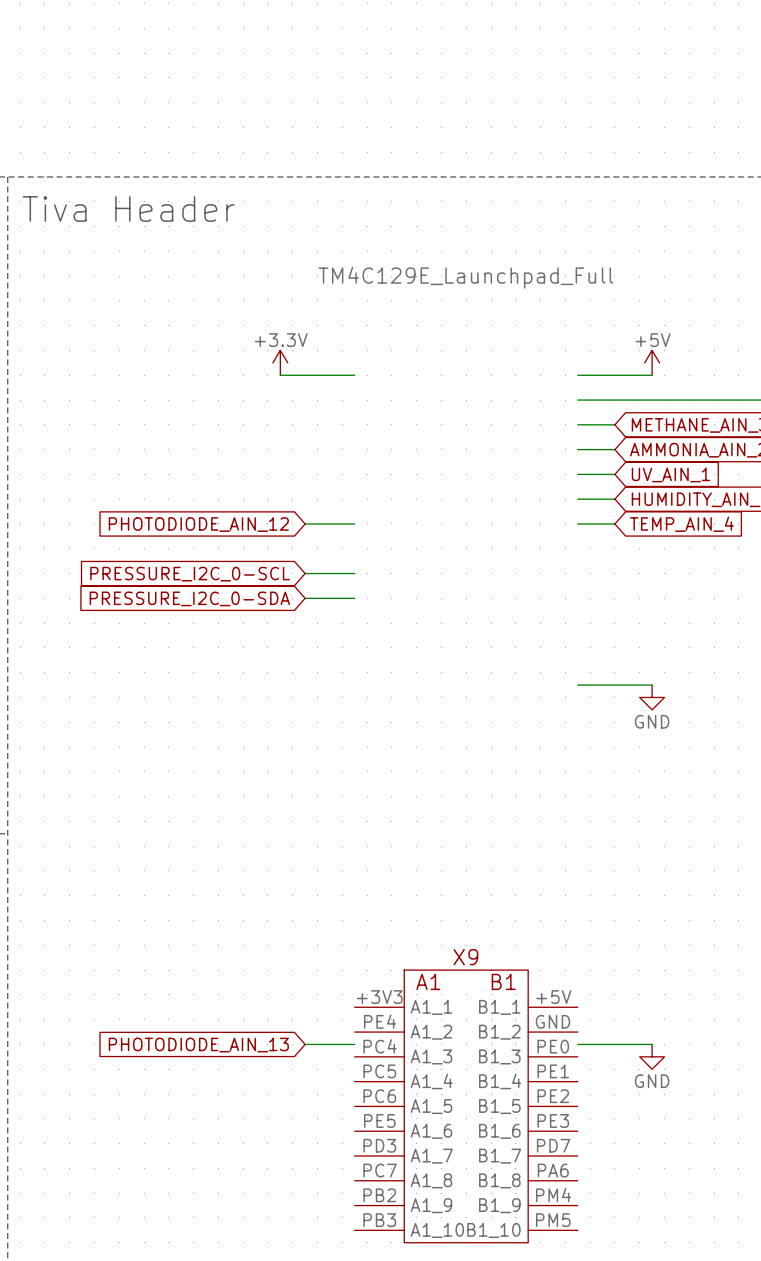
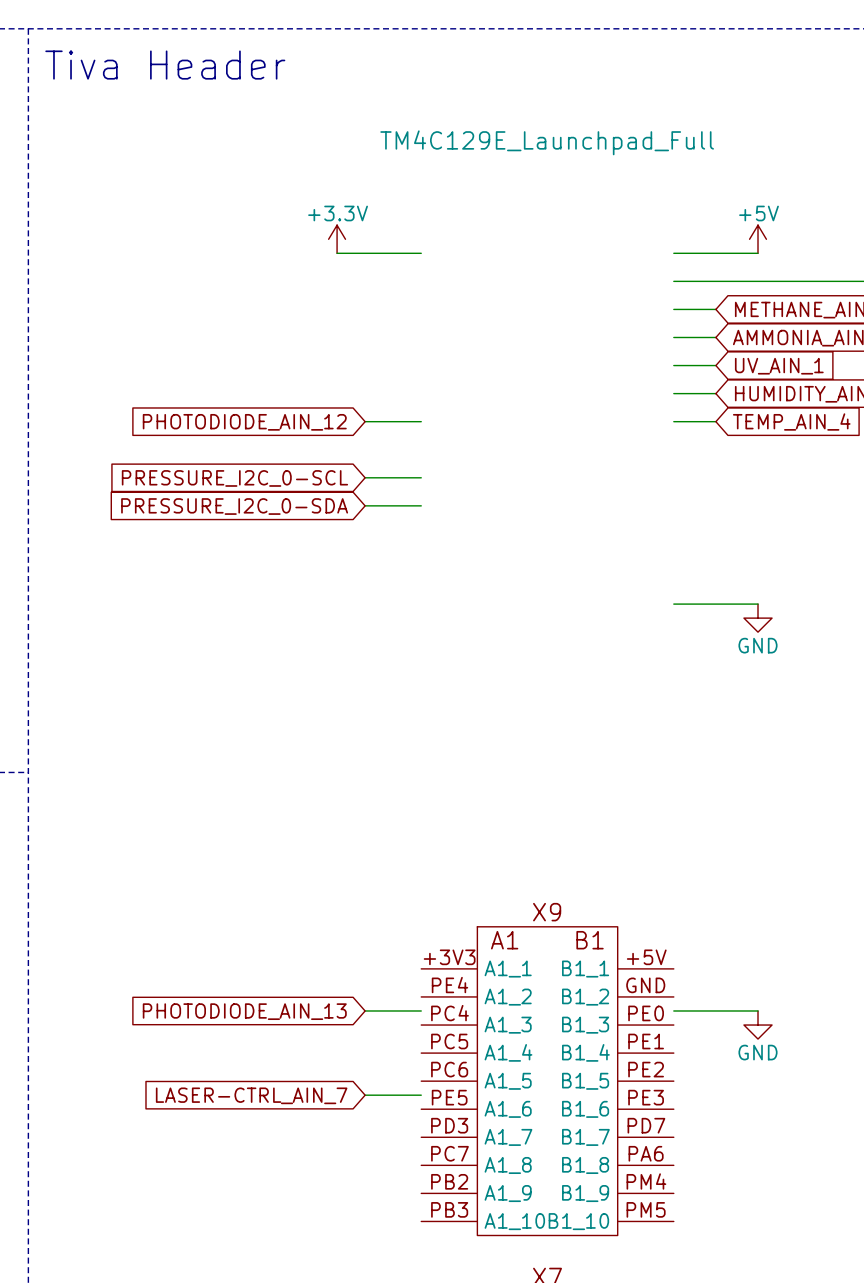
wire: none -> (365, 1095) (421, 1095)
global label: none -> LASER-CTRL_AIN_7 (251, 1095)

